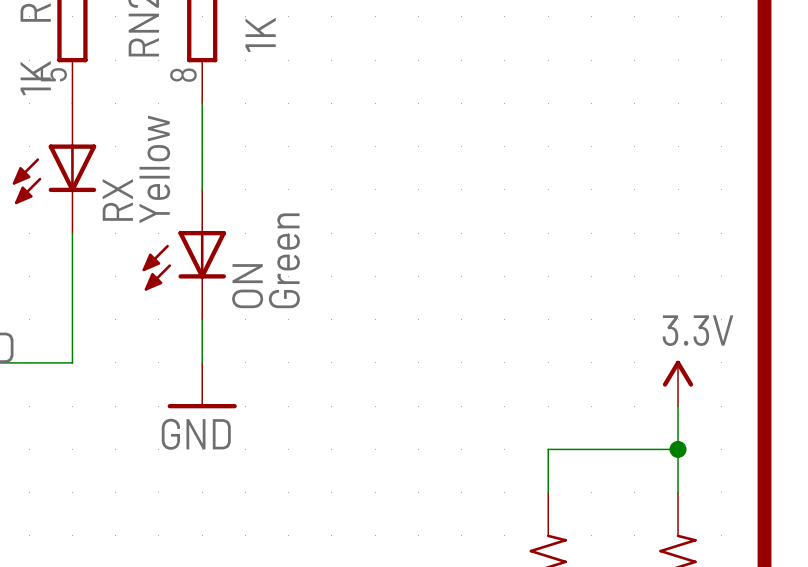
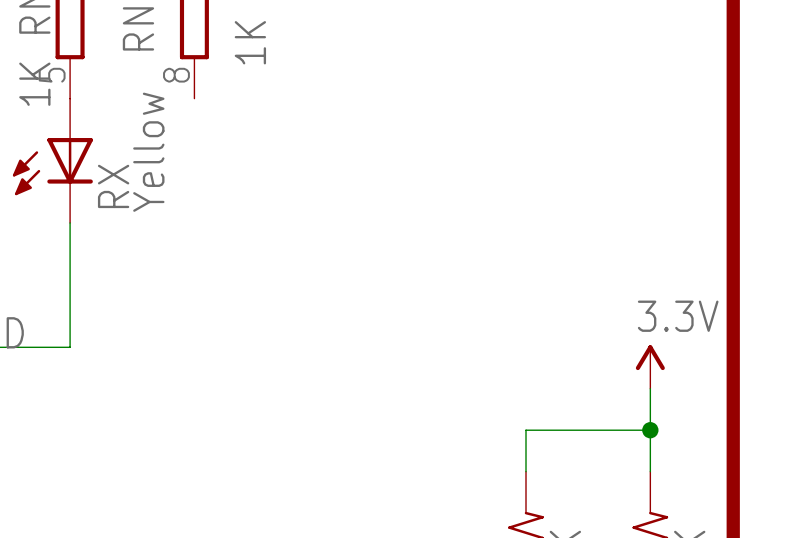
wire: (202, 103) (202, 189) -> none
ON: Green (184, 254) -> none
wire: (202, 319) (202, 362) -> none
power symbol: GND (202, 385) -> none

